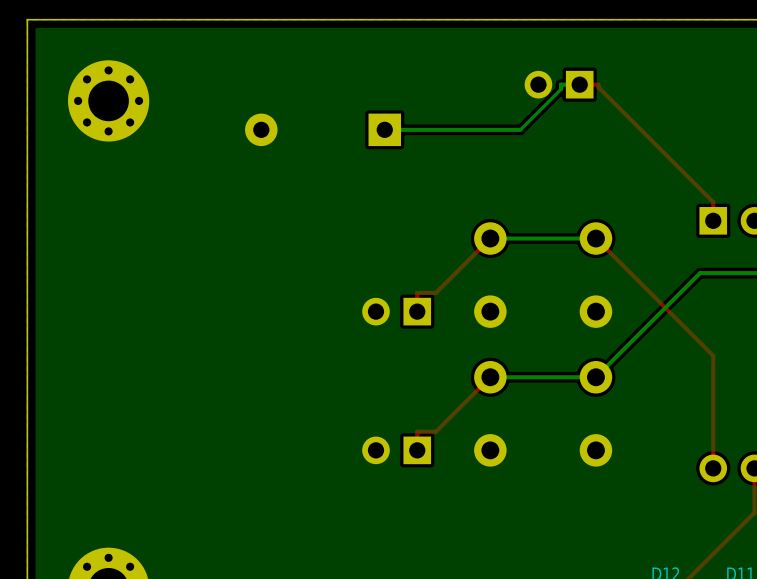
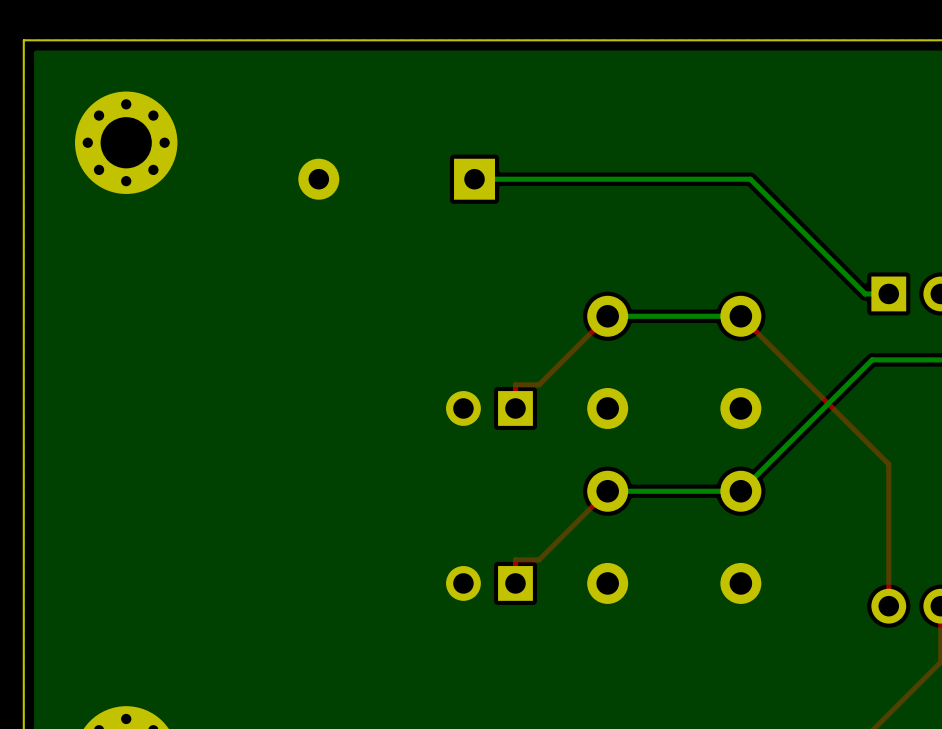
part: (559, 84) -> none
top track: (579, 84) (598, 84) (598, 87) (713, 202) (713, 220) -> none
bottom track: (579, 84) (561, 84) (561, 89) (520, 129) -> (888, 293) (865, 293) (750, 179) (645, 179)

